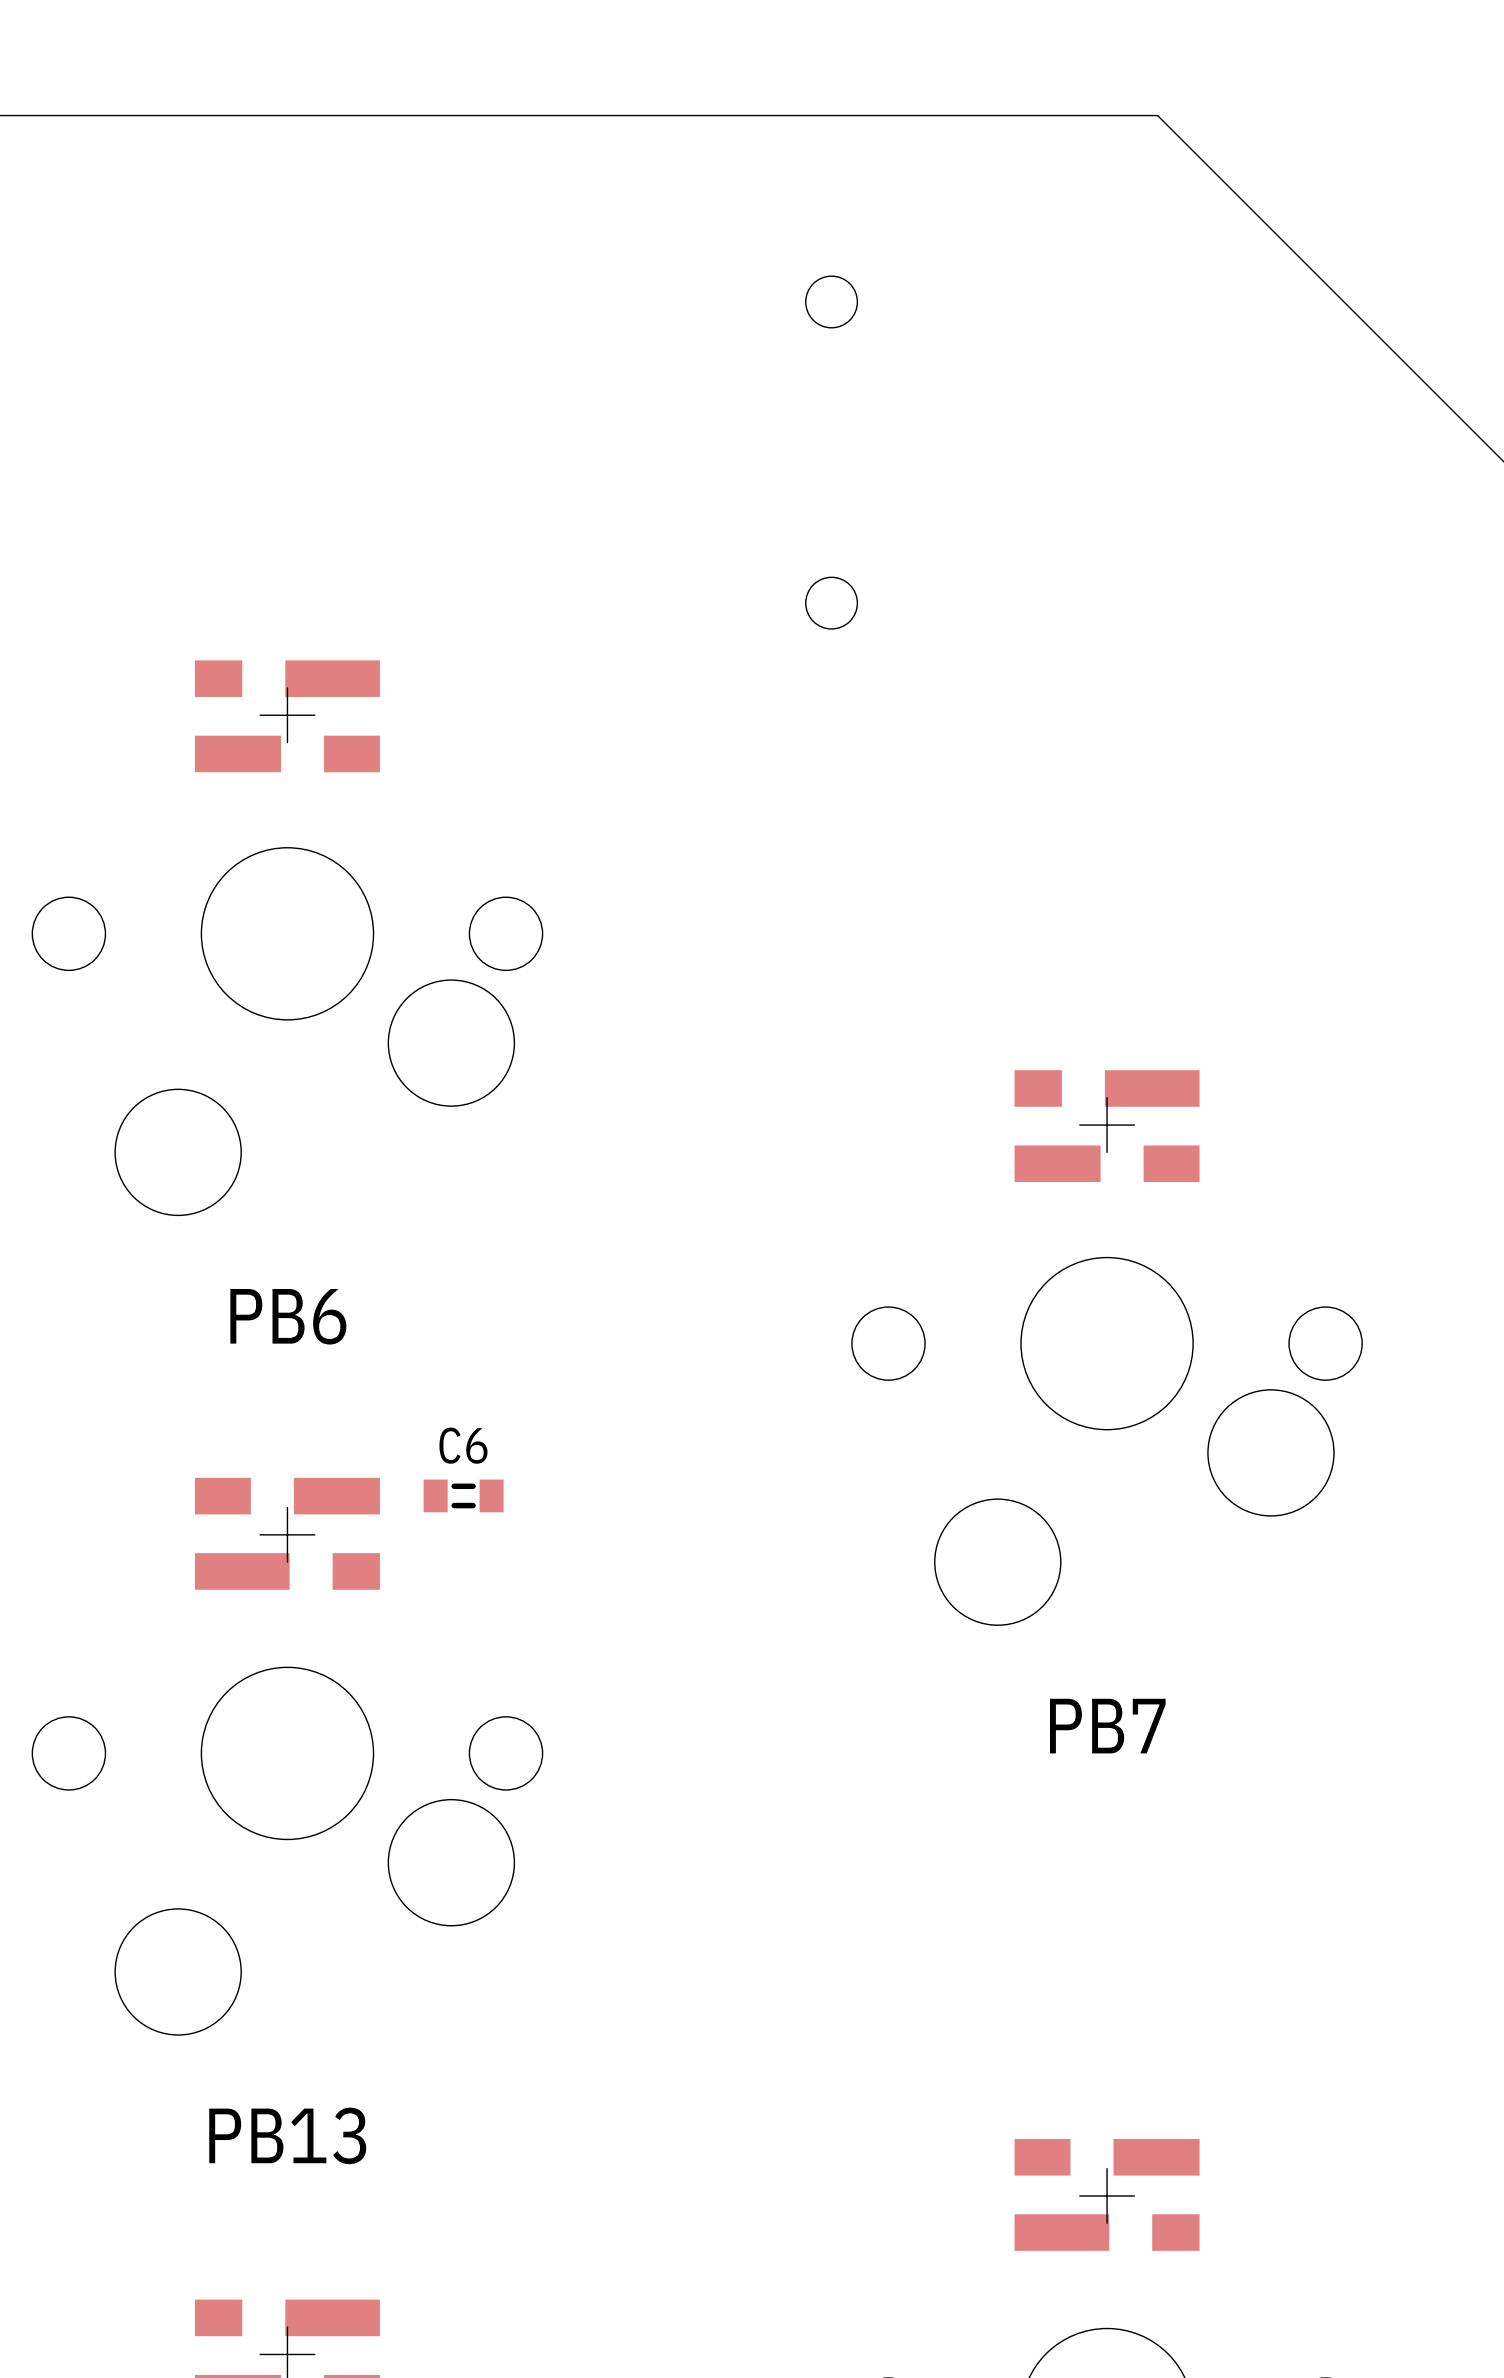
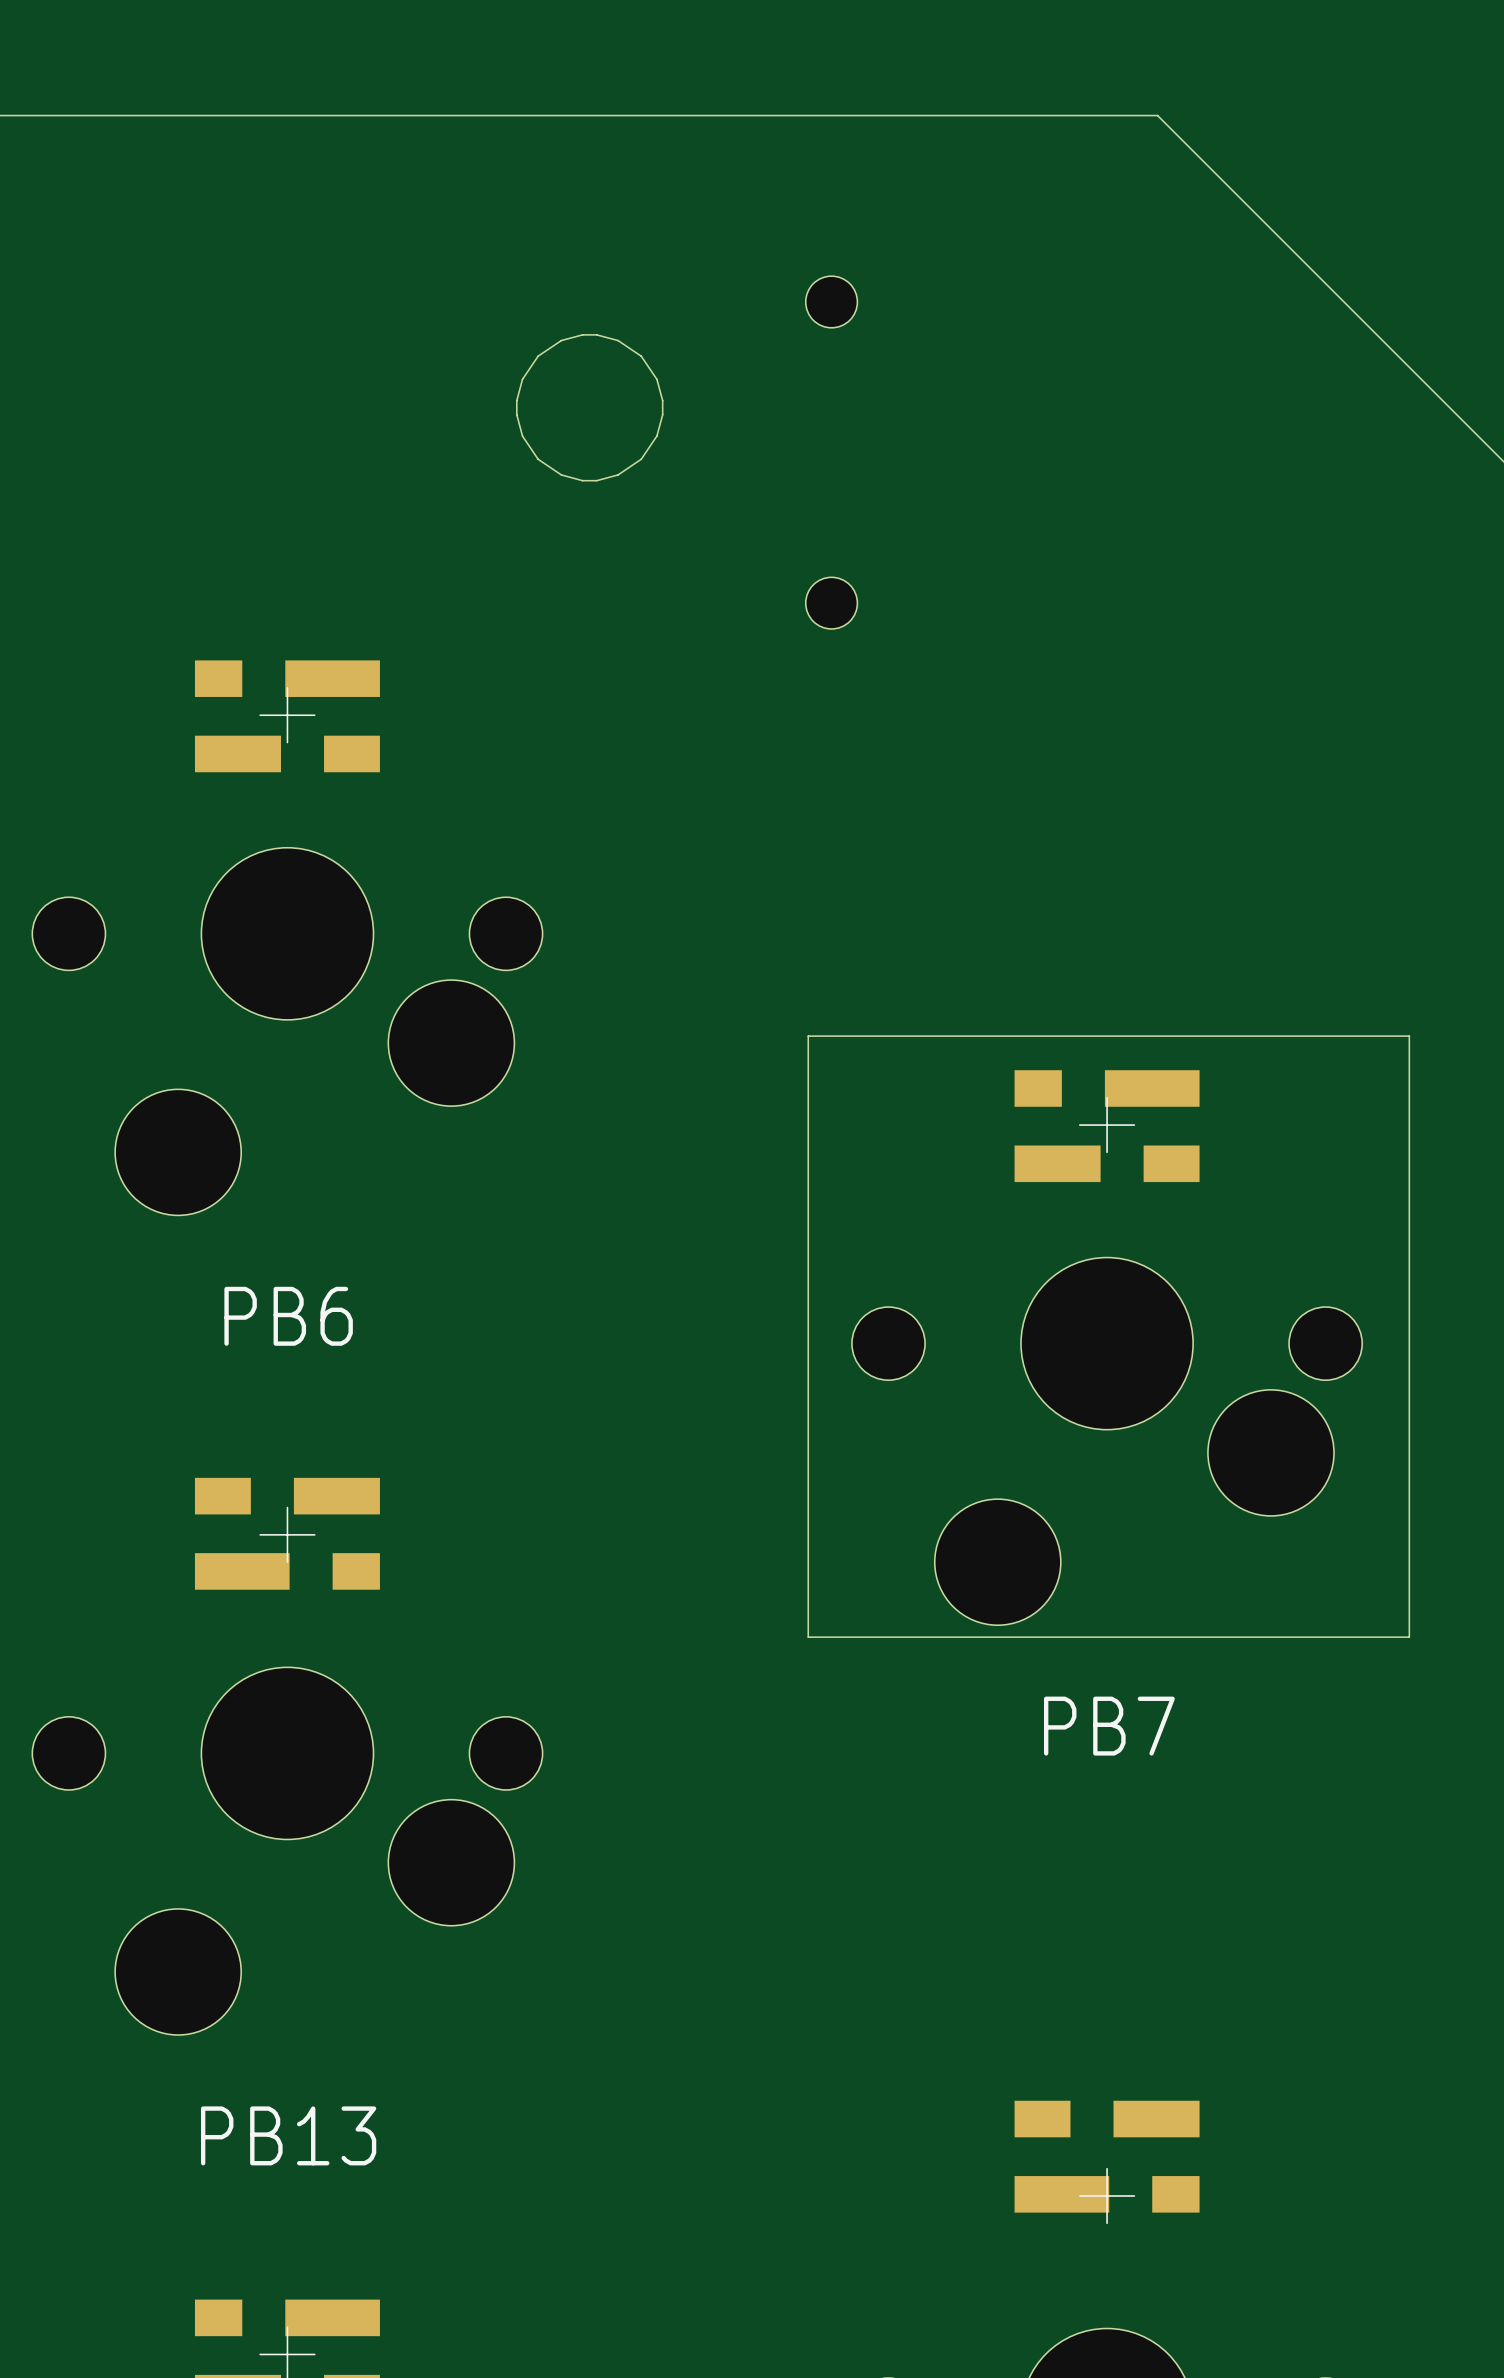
board edge: none -> (582, 334) (561, 340) (538, 356) (522, 379) (516, 400) (516, 414) (522, 436) (538, 459) (561, 474) (582, 480) (596, 480) (618, 474) (641, 459) (656, 436) (662, 414) (662, 400) (656, 379) (641, 356) (618, 340) (596, 334) (582, 334)
board edge: none -> (808, 1036) (1409, 1036) (1409, 1637) (808, 1637) (808, 1036)
C6: (463, 1495) -> none
part position: (1107, 2194) -> (1107, 2156)

